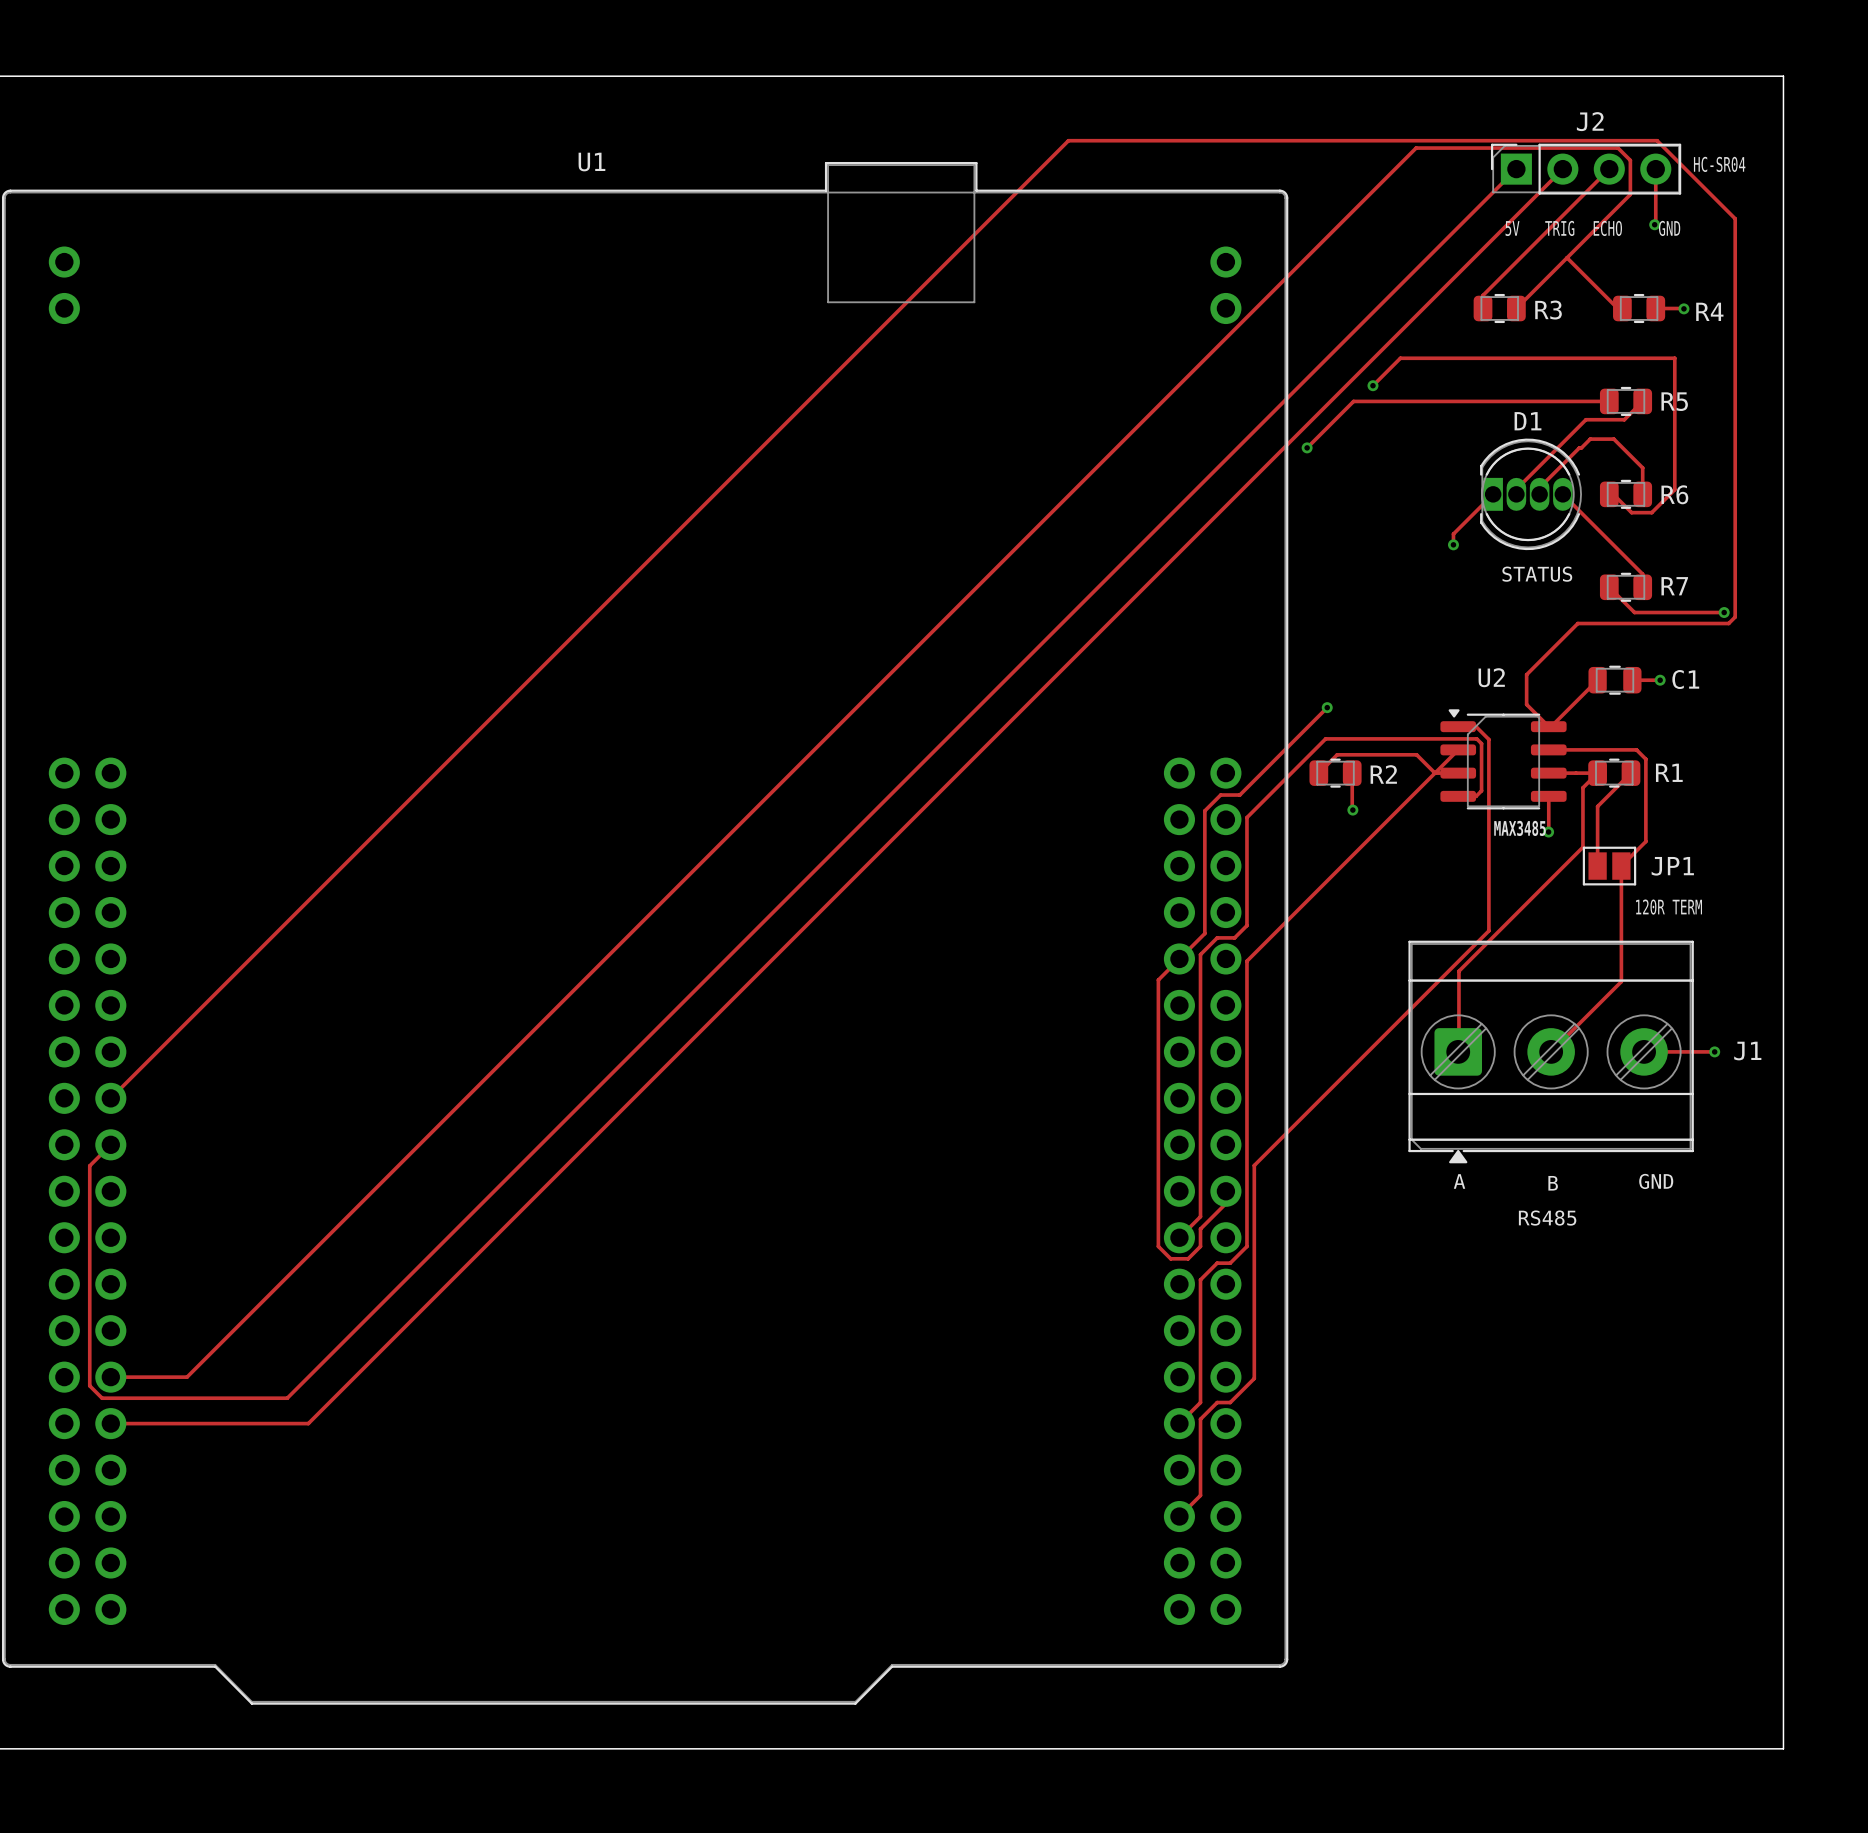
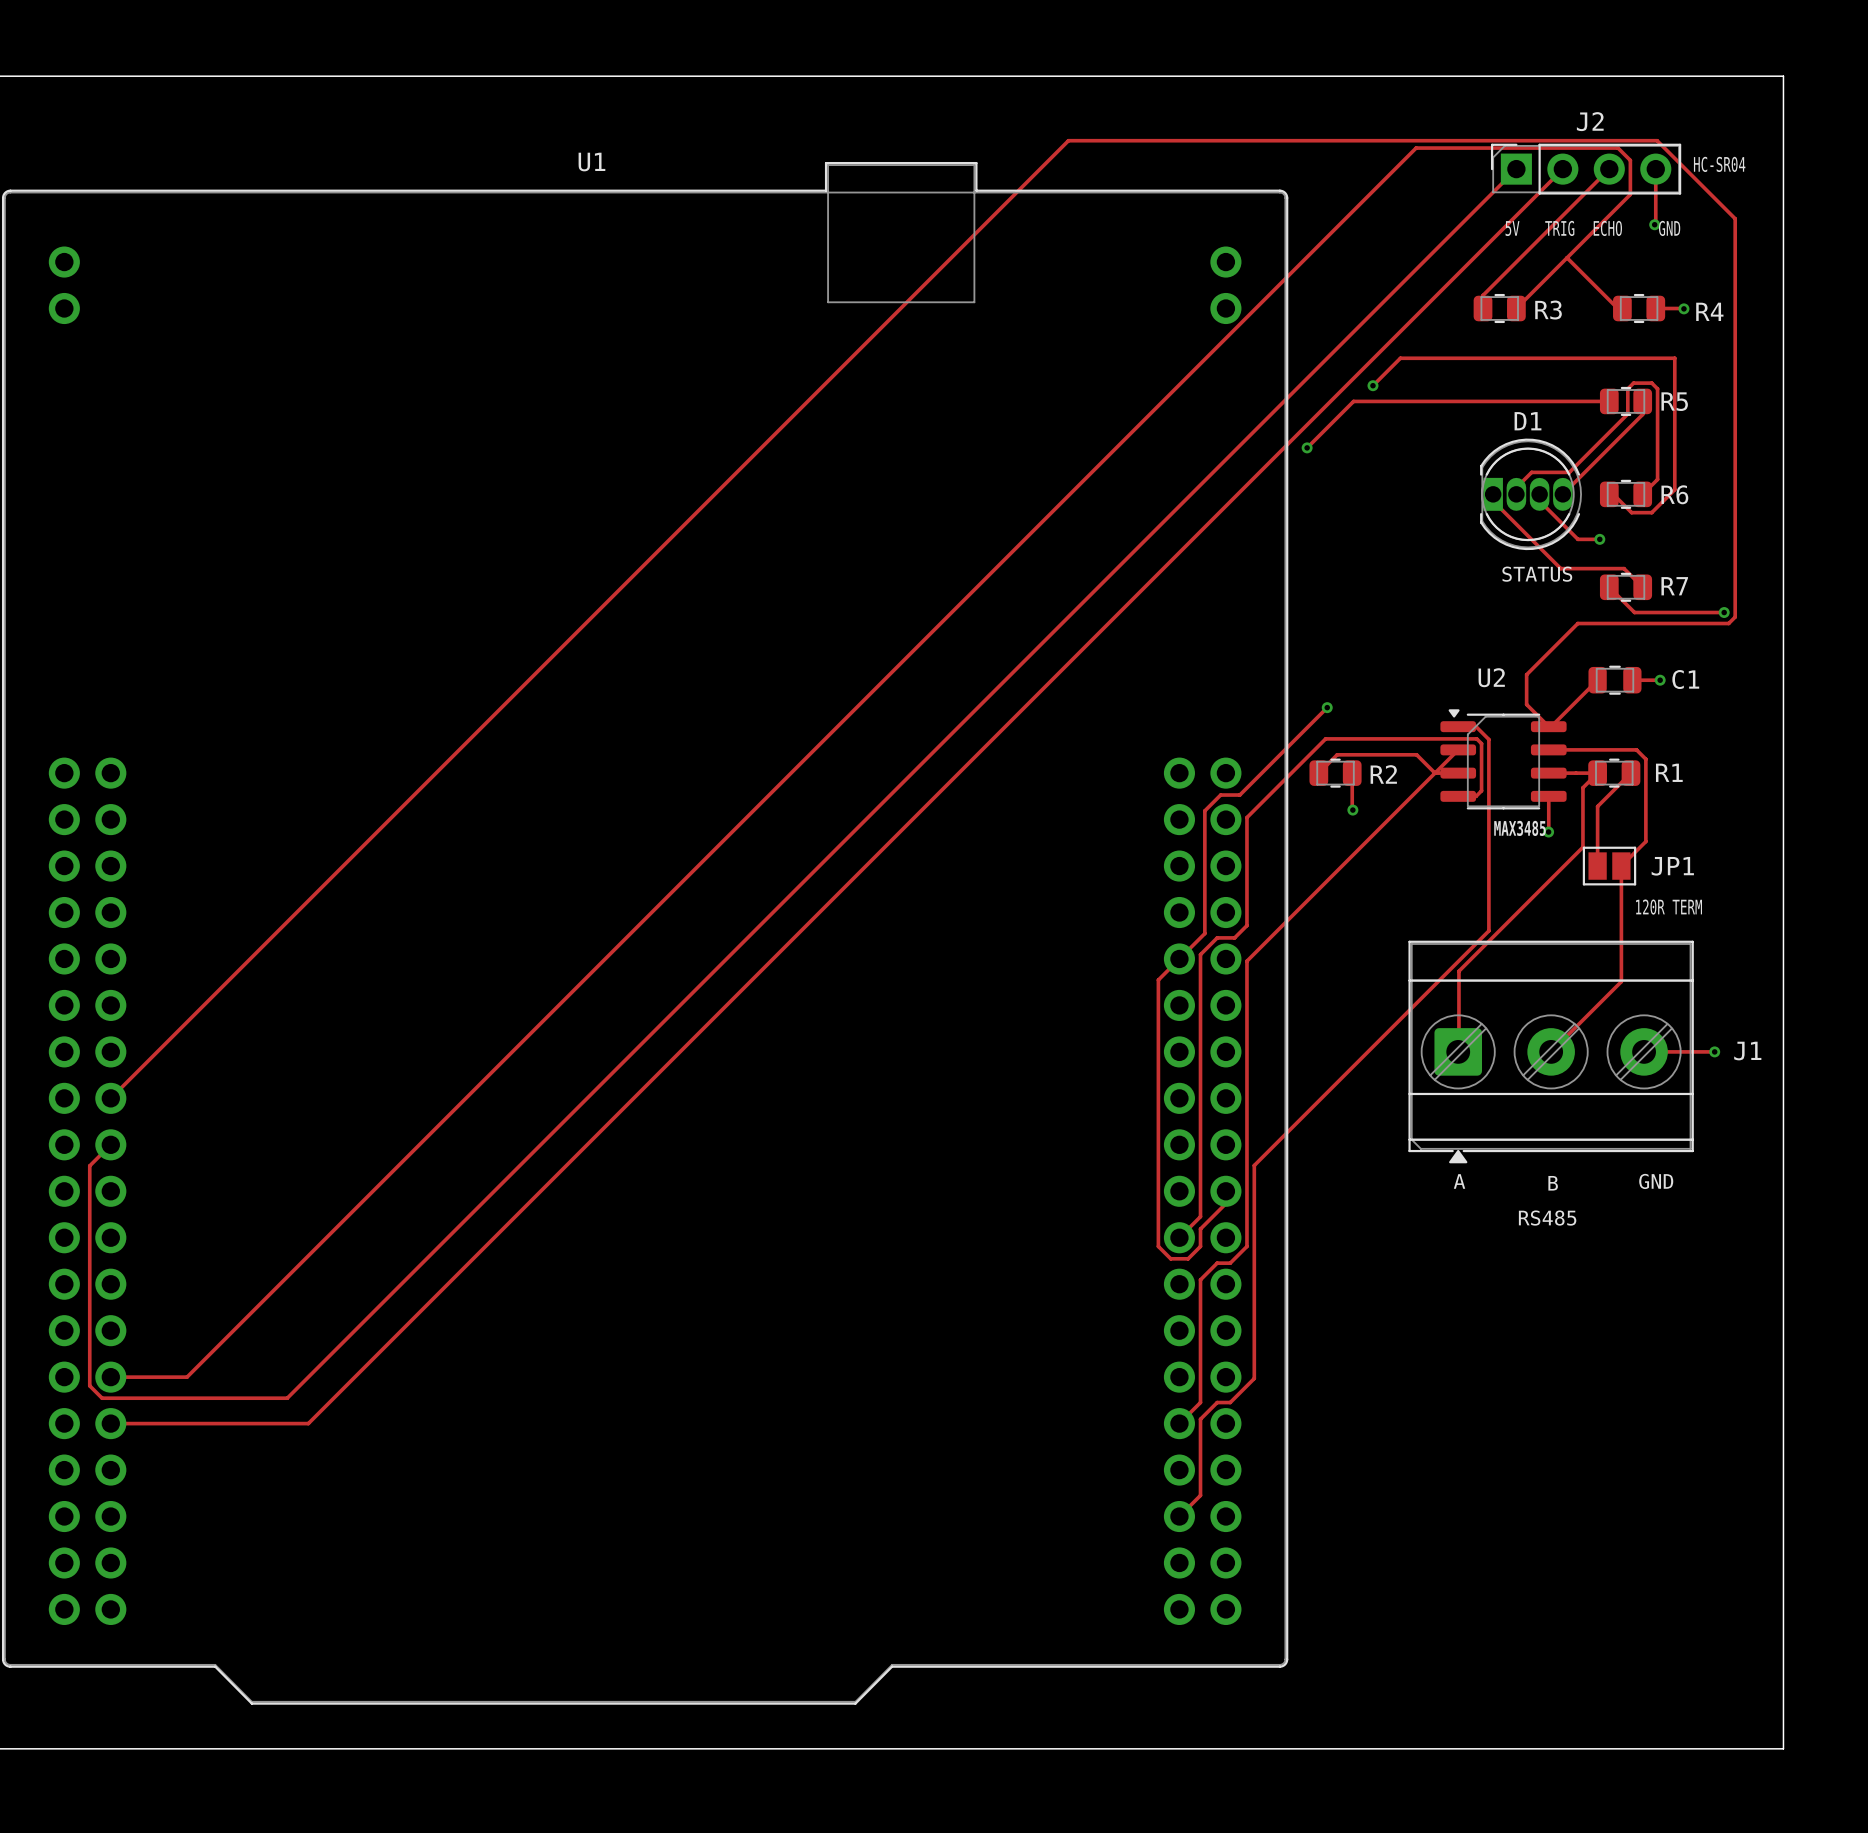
track: (1642, 401) (1624, 419) (1585, 419) (1516, 489) -> (1642, 401) (1642, 414) (1562, 494)
track: (1539, 487) (1590, 439) (1613, 439) (1642, 467) (1642, 494) -> (1516, 489) (1531, 472) (1569, 472) (1627, 413) (1627, 388) (1633, 383) (1651, 383) (1657, 388) (1657, 479) (1642, 494)
track: (1493, 494) (1453, 534) (1453, 546) -> none
track: none -> (1539, 494) (1539, 501) (1577, 539) (1599, 539)
track: (1562, 494) (1642, 574) (1642, 587) -> (1493, 494) (1493, 501) (1560, 568) (1624, 568) (1642, 587)
via: none -> (1599, 539)
via: (1453, 544) -> none

